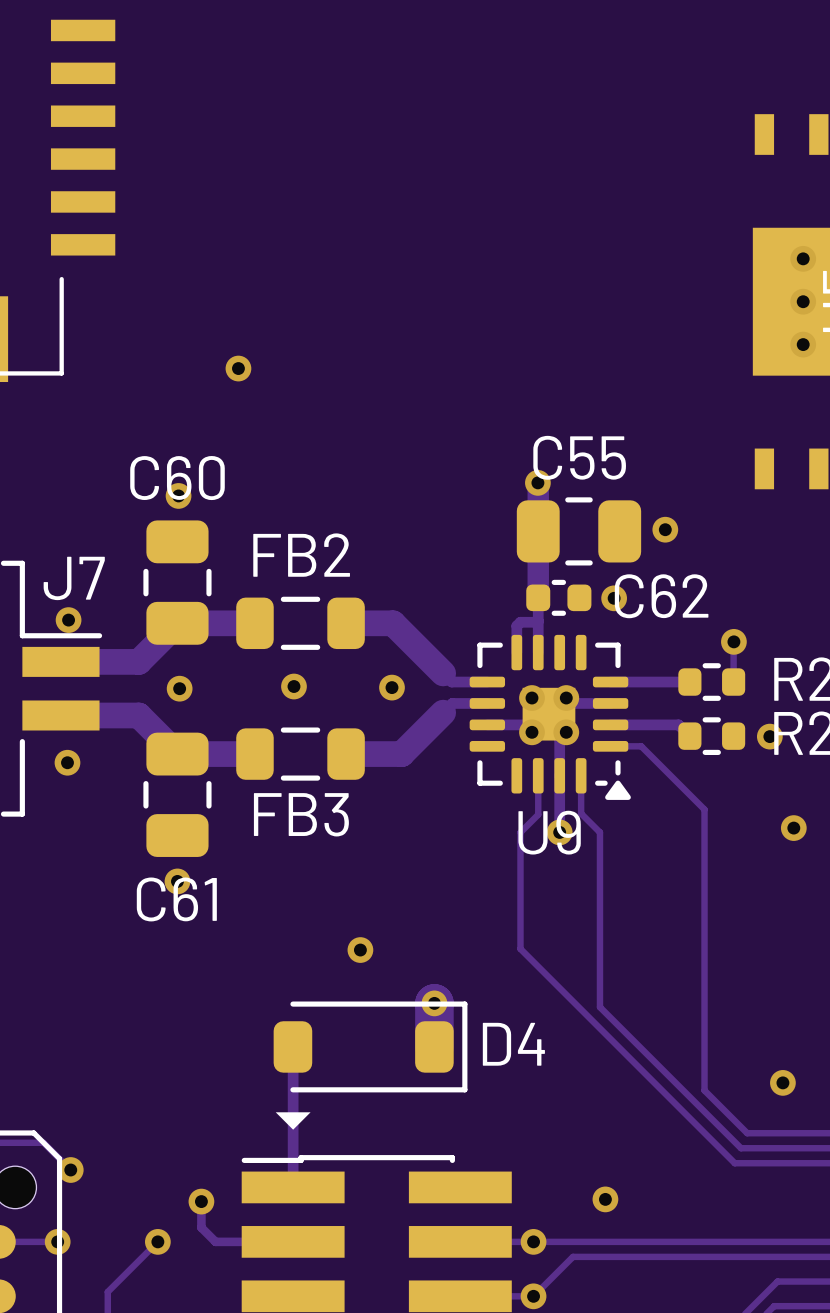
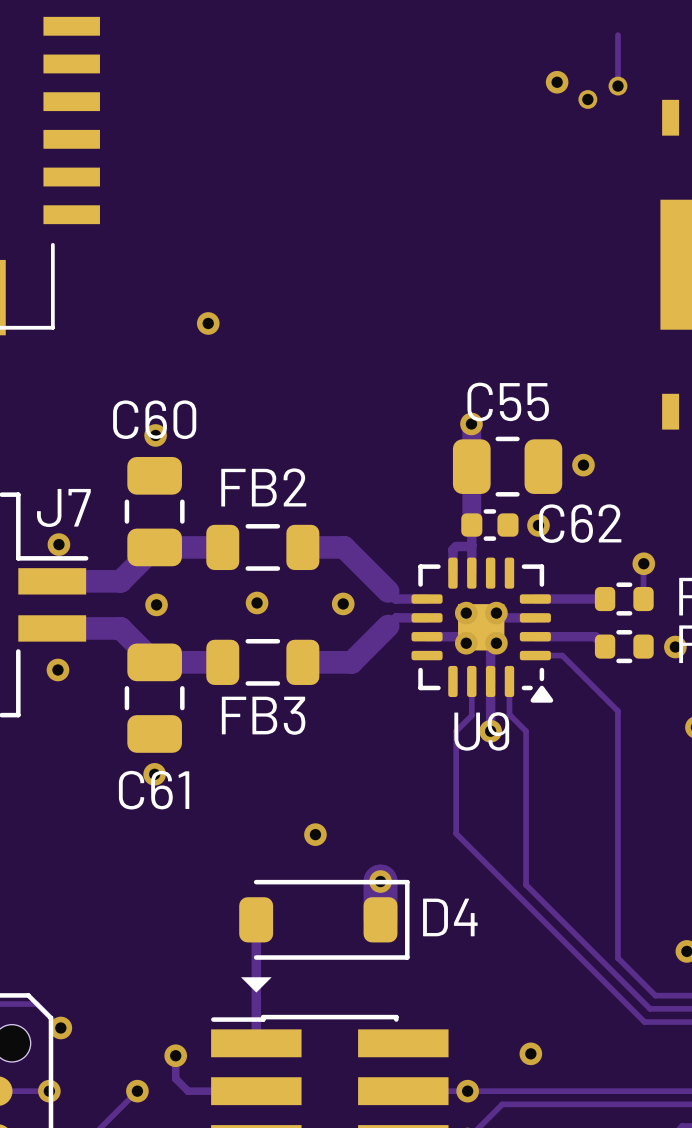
track: none -> (618, 35) (618, 86)
via: none -> (557, 82)
via: none -> (618, 86)
via: none -> (587, 99)

